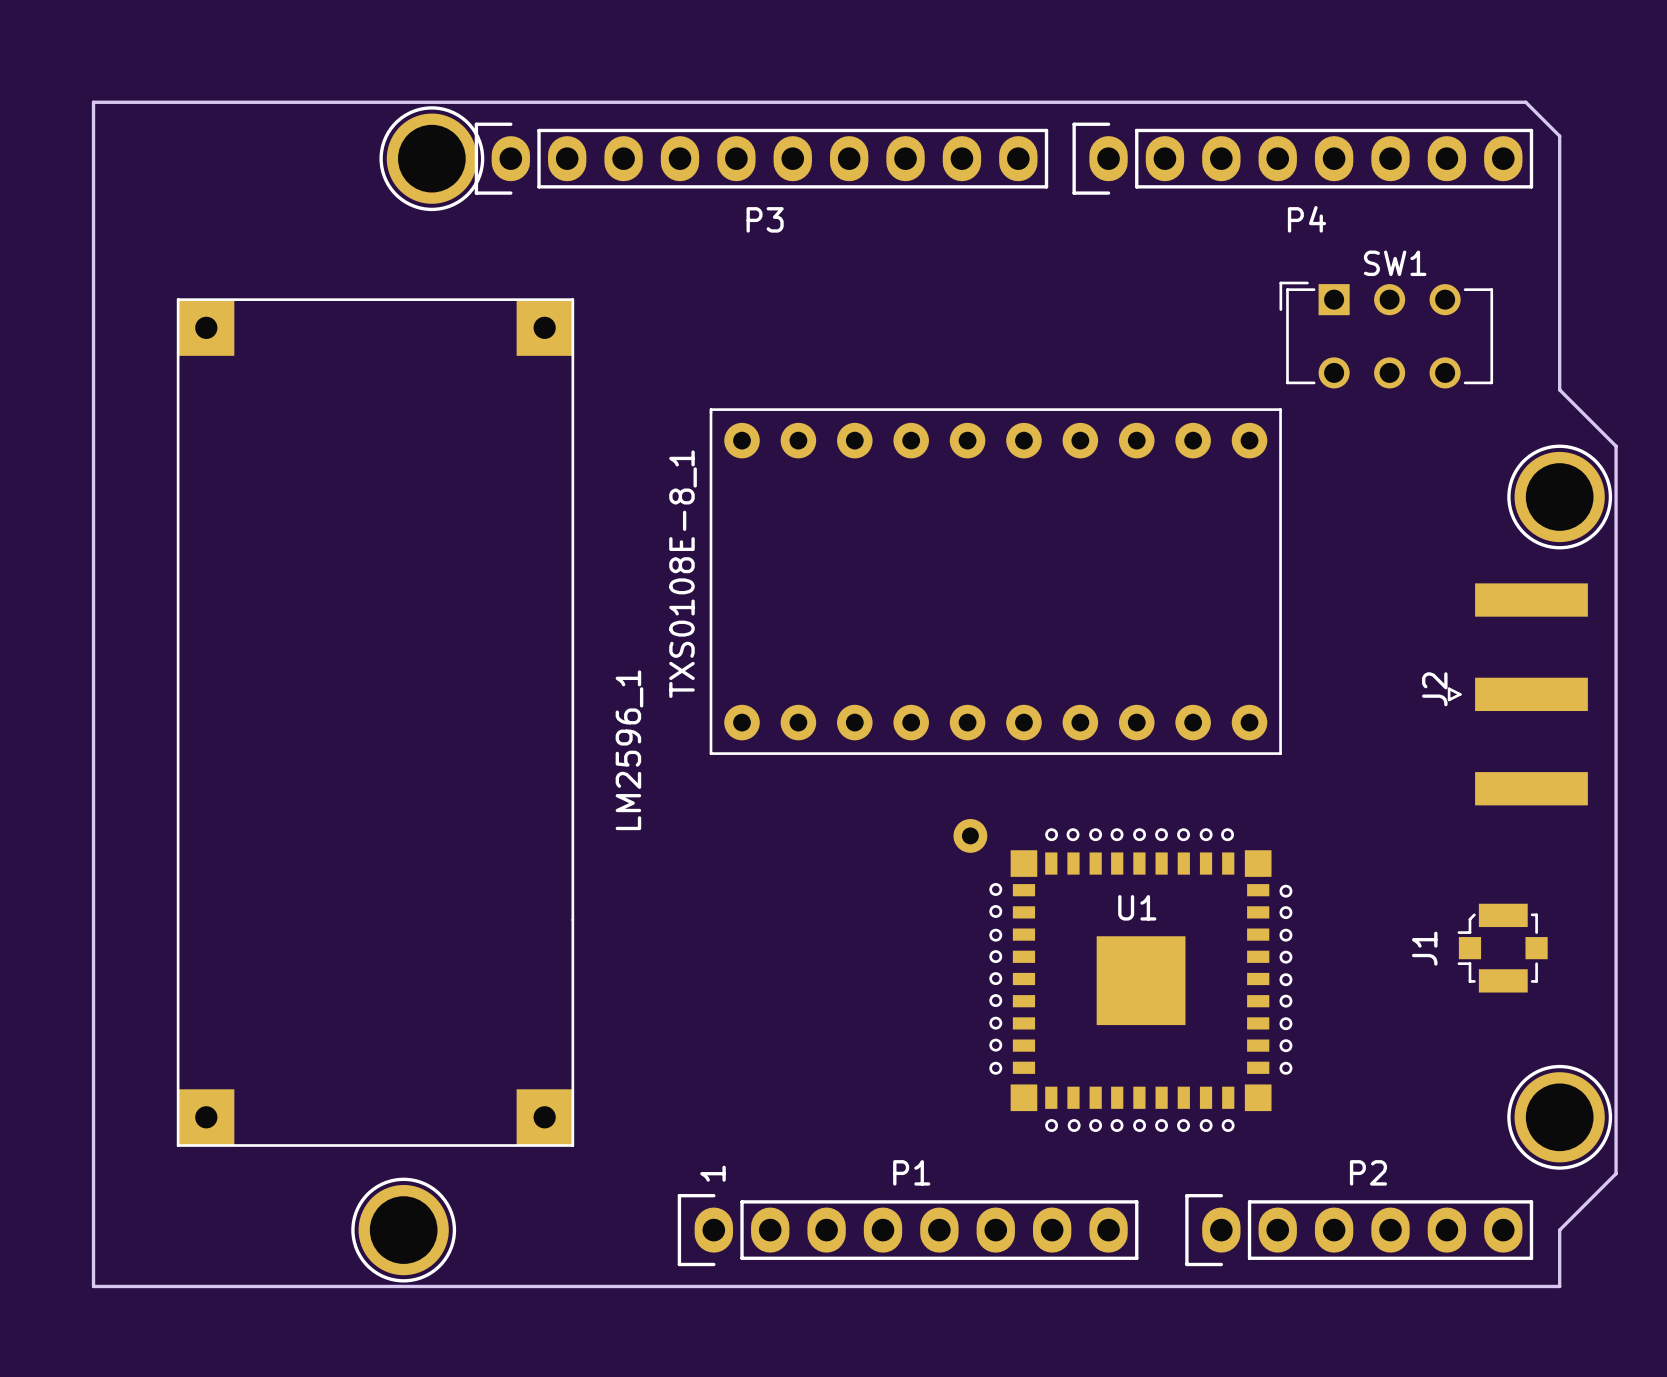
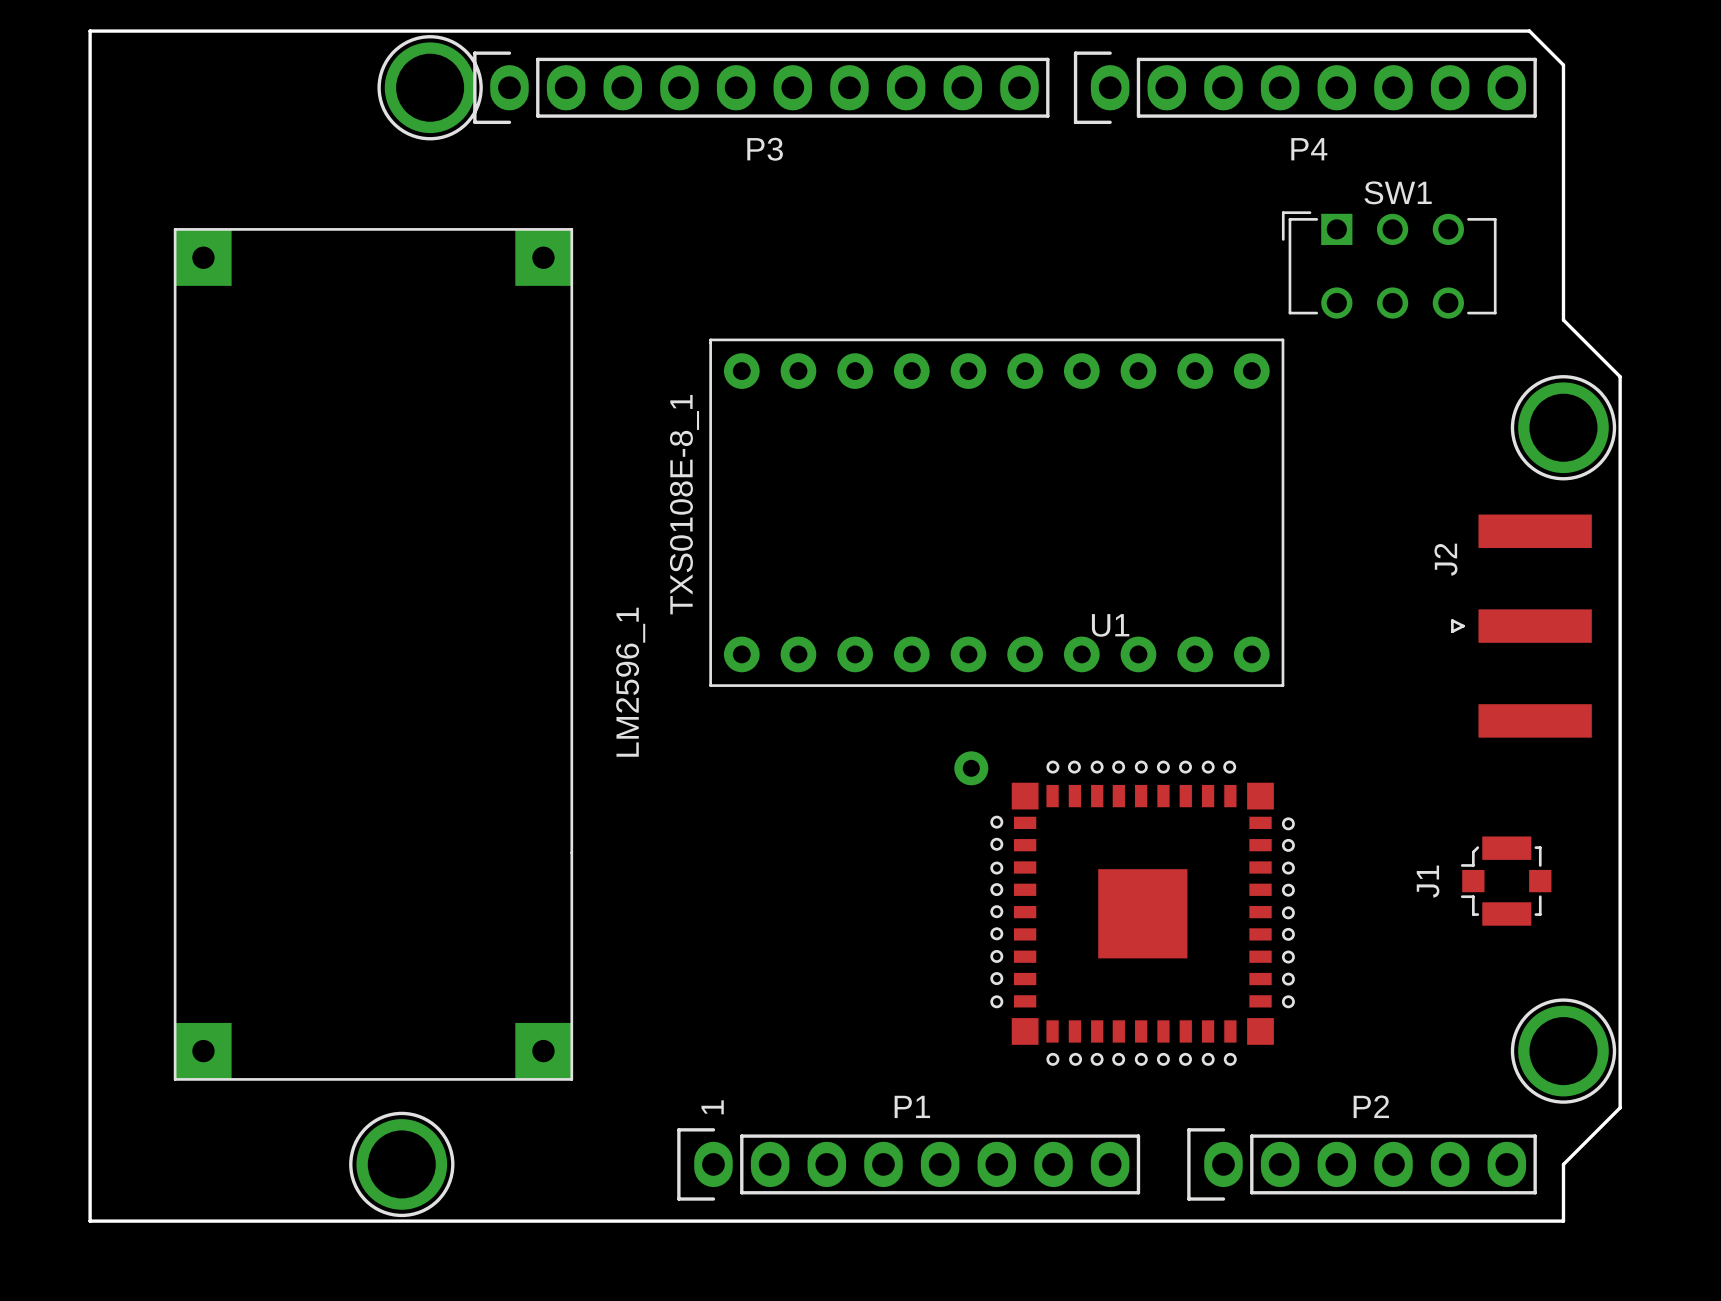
J2 name position: J2 (1434, 689) -> J2 (1445, 559)
U1 name position: U1 (1137, 907) -> U1 (1110, 625)

